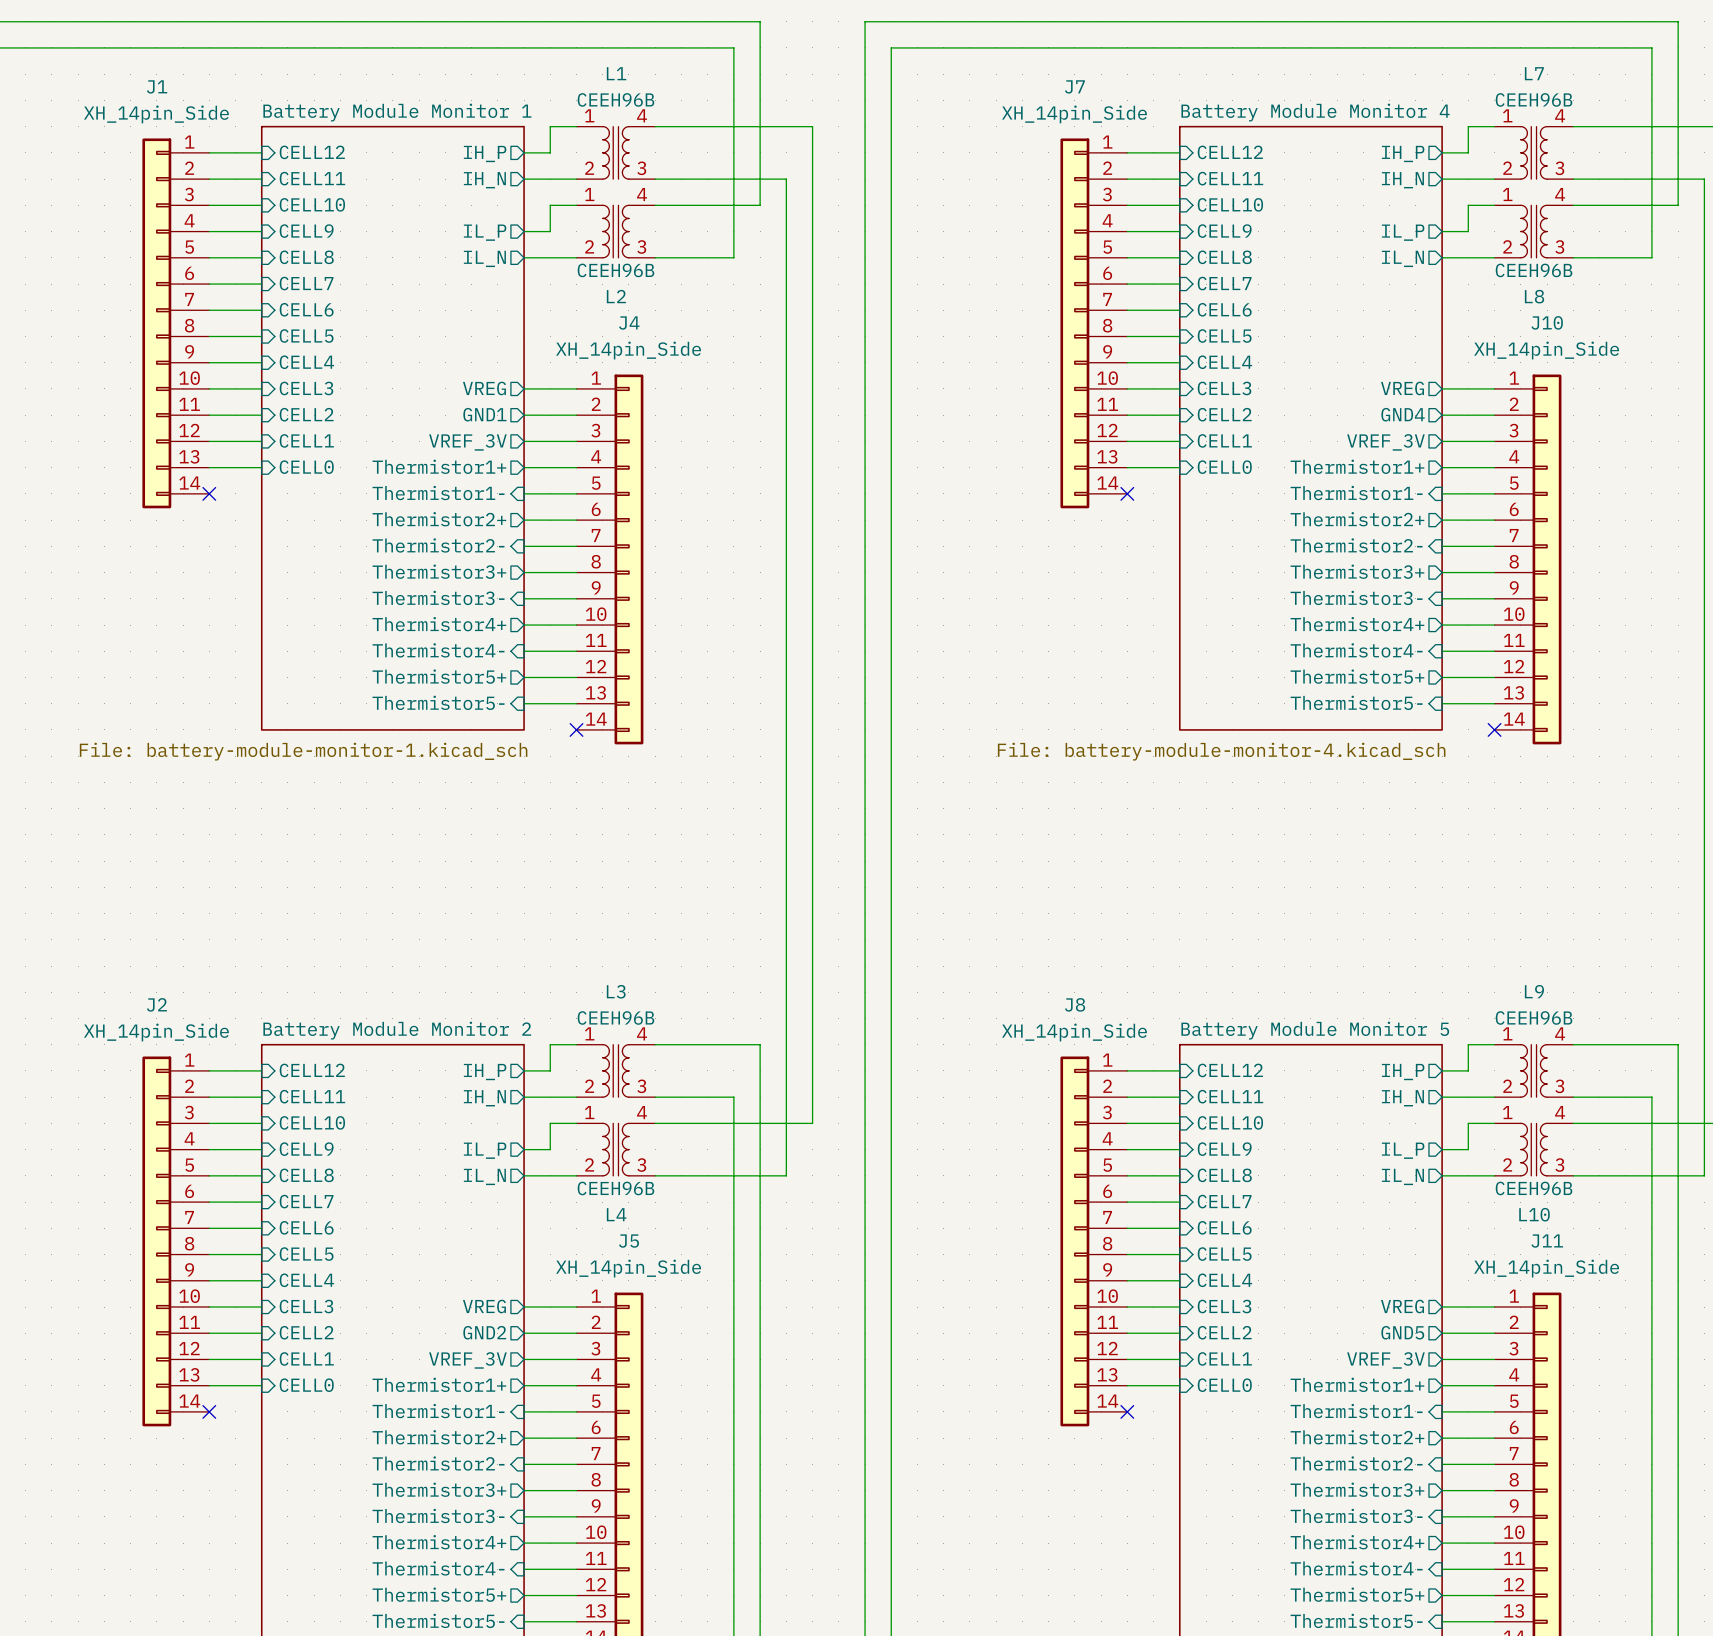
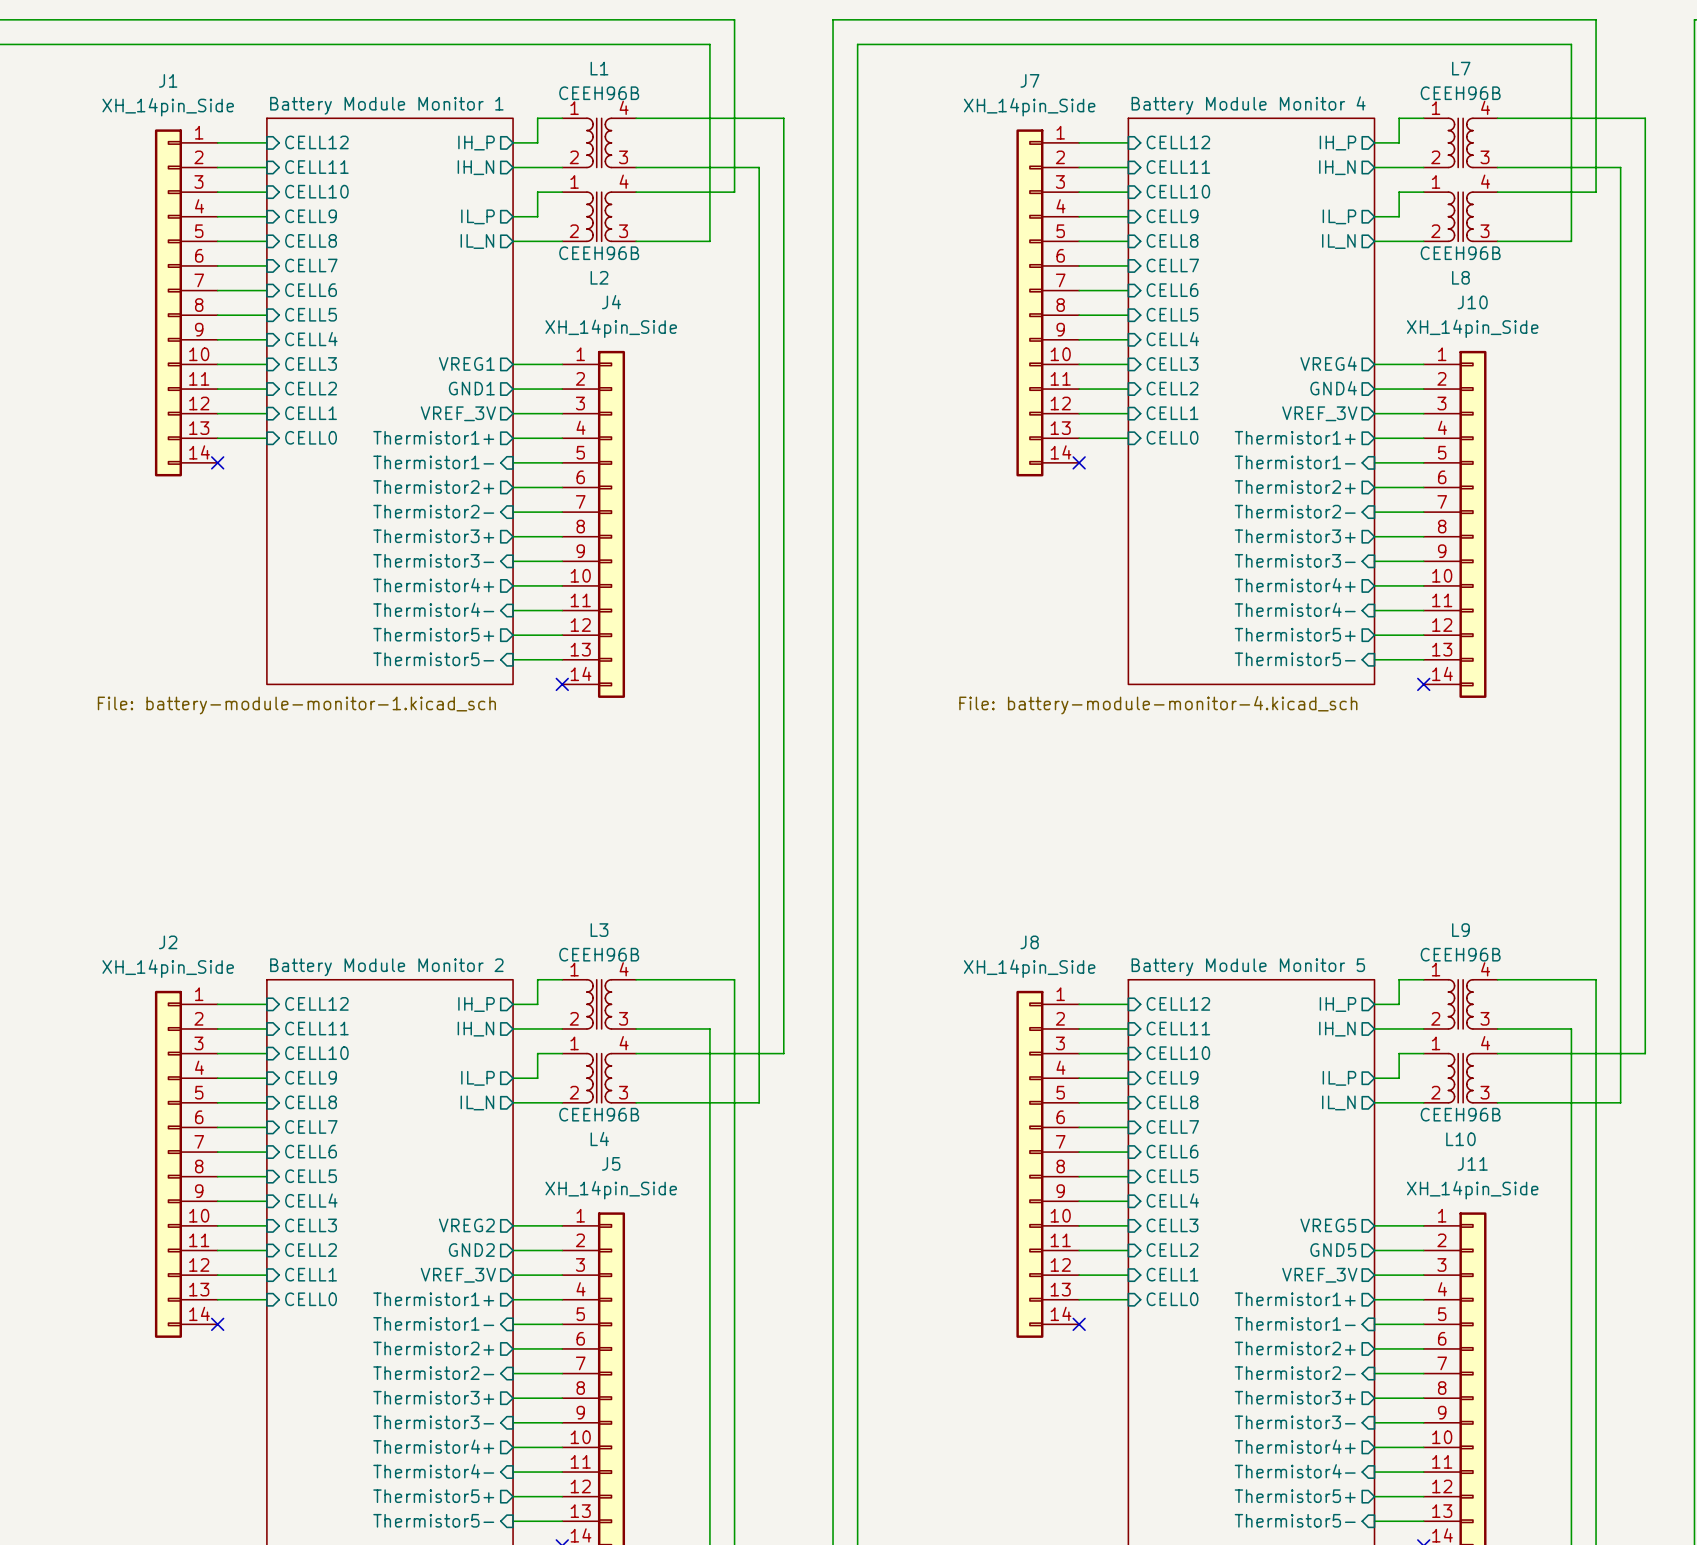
sheet pin: VREG (484, 388) -> VREG1 (466, 363)
sheet pin: VREG (1402, 388) -> VREG4 (1328, 363)
sheet pin: VREG (484, 1306) -> VREG2 (466, 1225)
sheet pin: VREG (1402, 1306) -> VREG5 (1328, 1225)

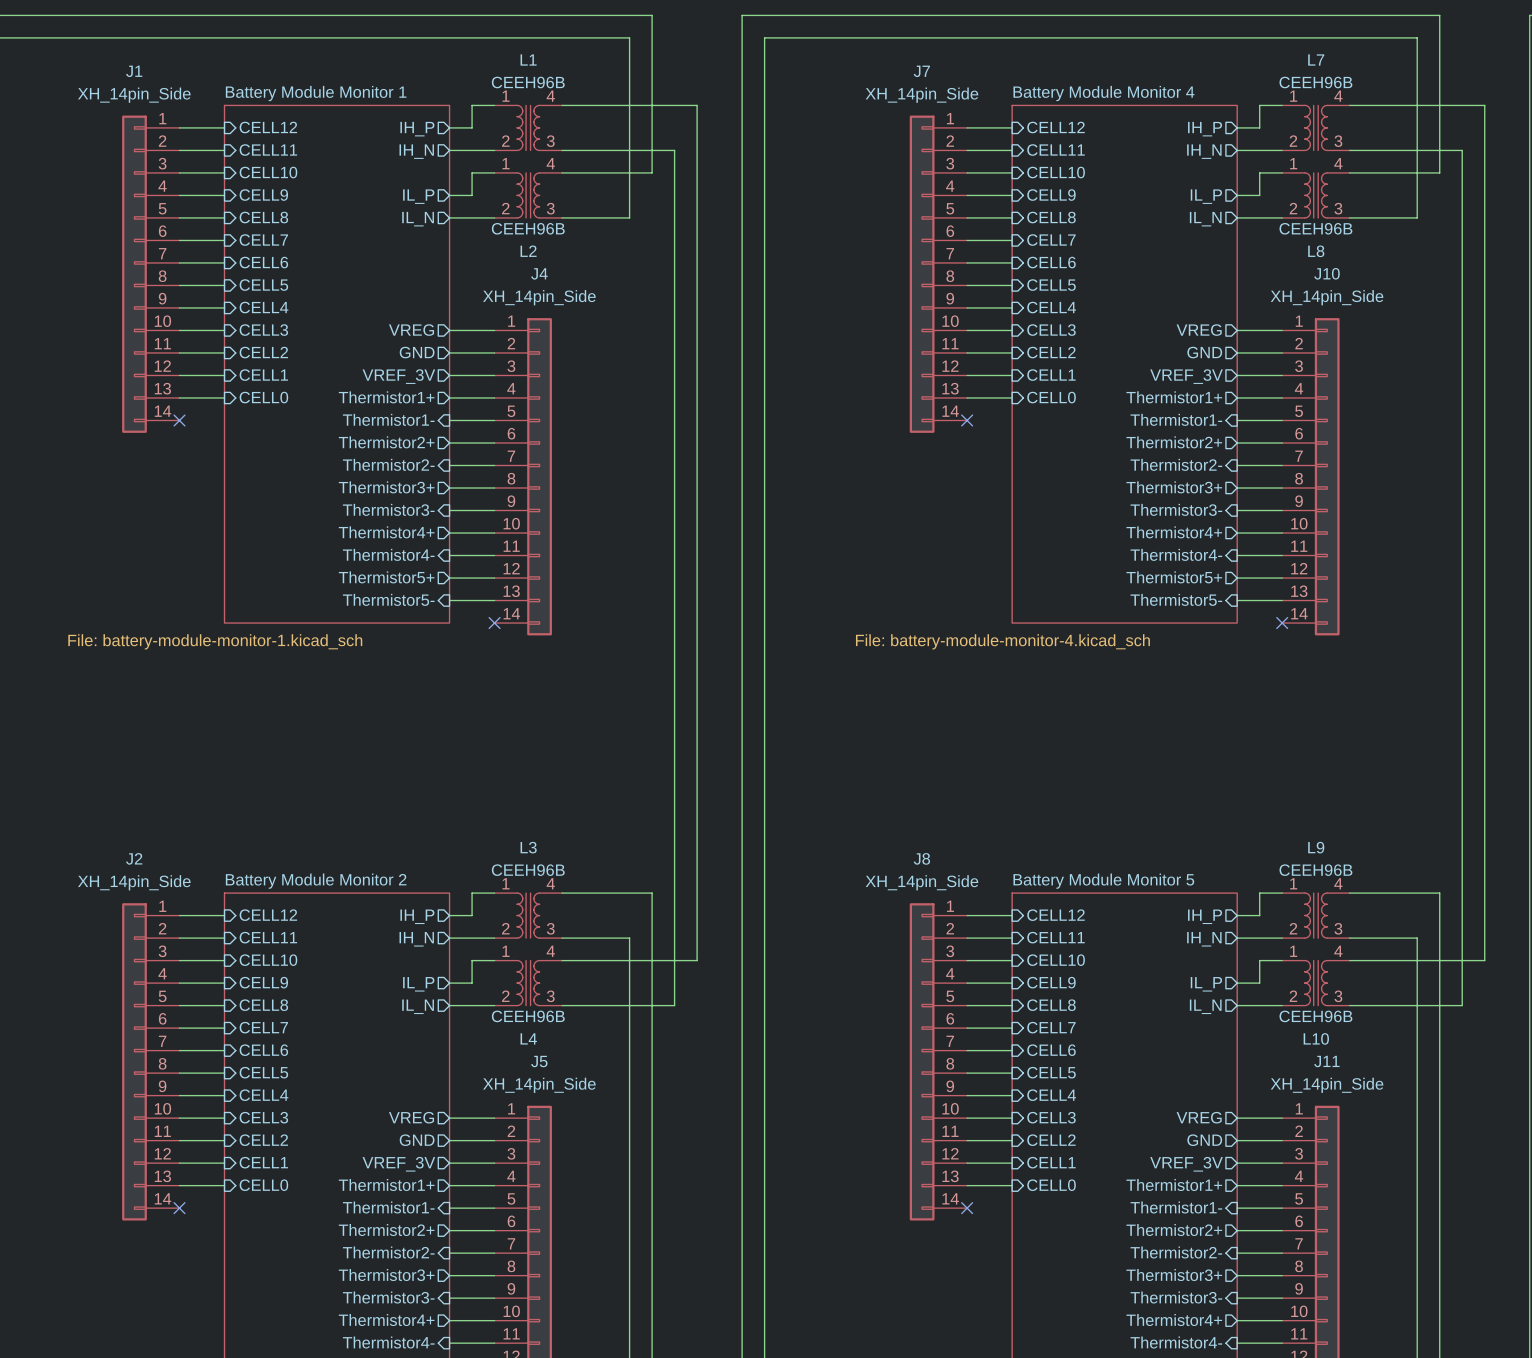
sheet pin: VREG1 (466, 363) -> VREG (411, 330)
sheet pin: VREG4 (1328, 363) -> VREG (1199, 330)
sheet pin: GND1 (471, 388) -> GND (417, 352)
sheet pin: GND4 (1333, 388) -> GND (1204, 352)
sheet pin: VREG2 (466, 1225) -> VREG (411, 1117)
sheet pin: VREG5 (1328, 1225) -> VREG (1199, 1117)
sheet pin: GND2 (471, 1250) -> GND (417, 1140)
sheet pin: GND5 (1333, 1250) -> GND (1204, 1140)

